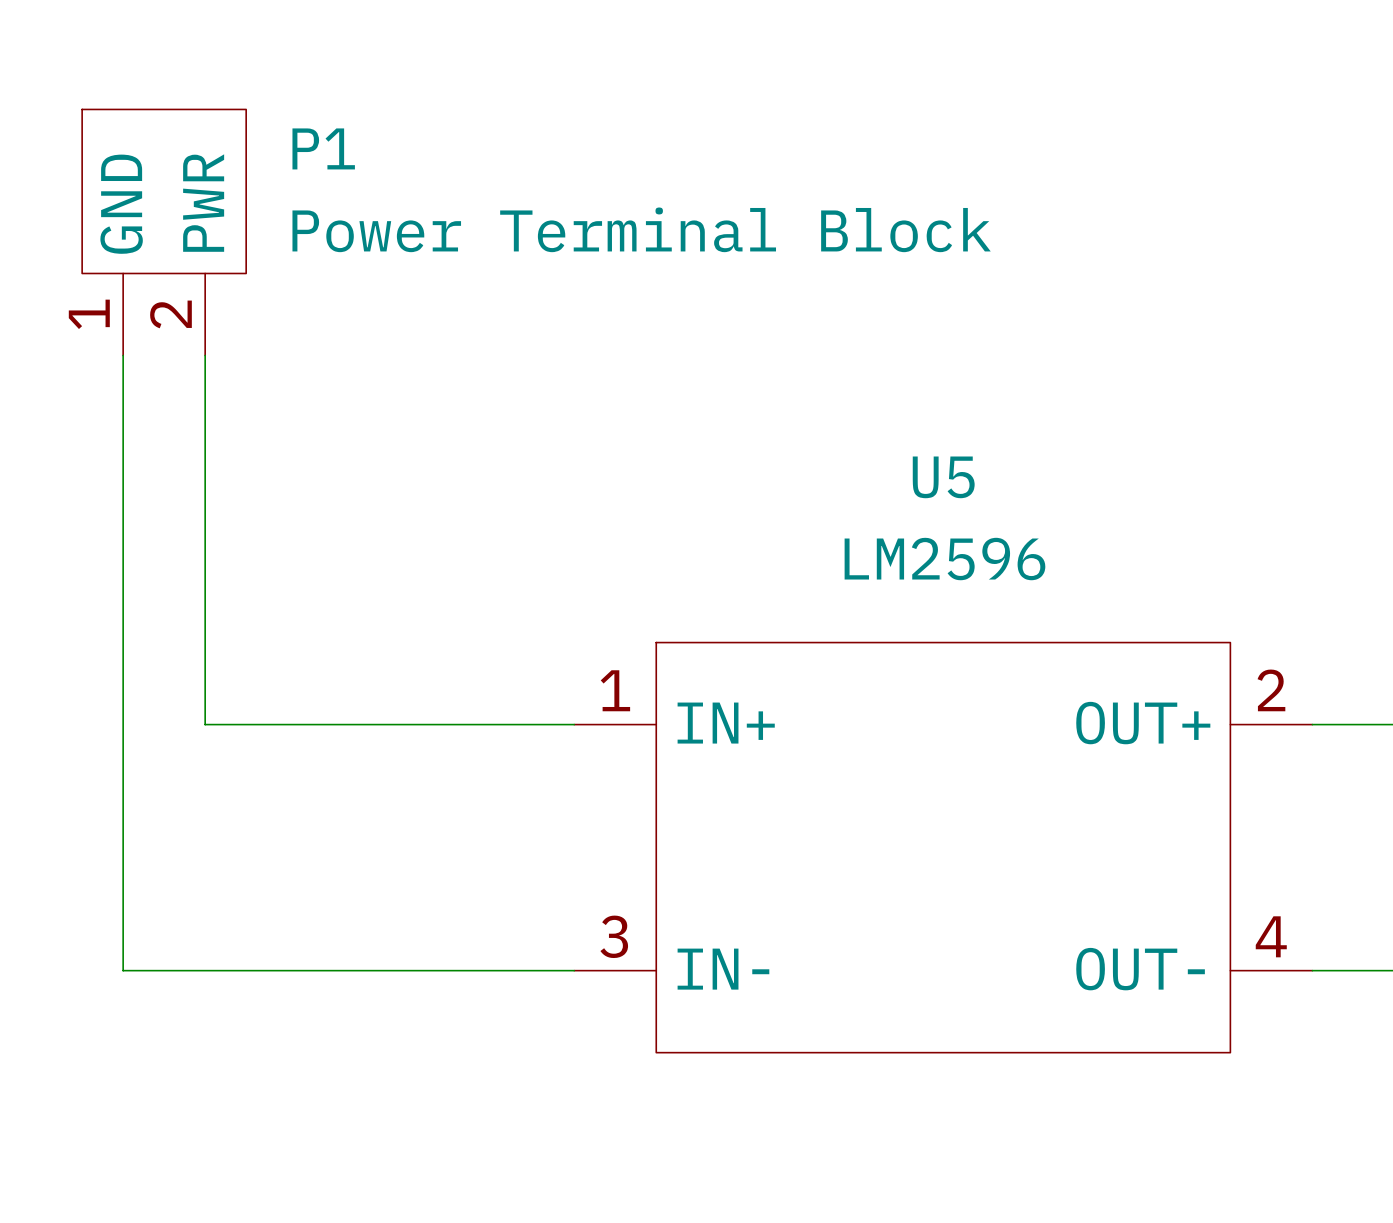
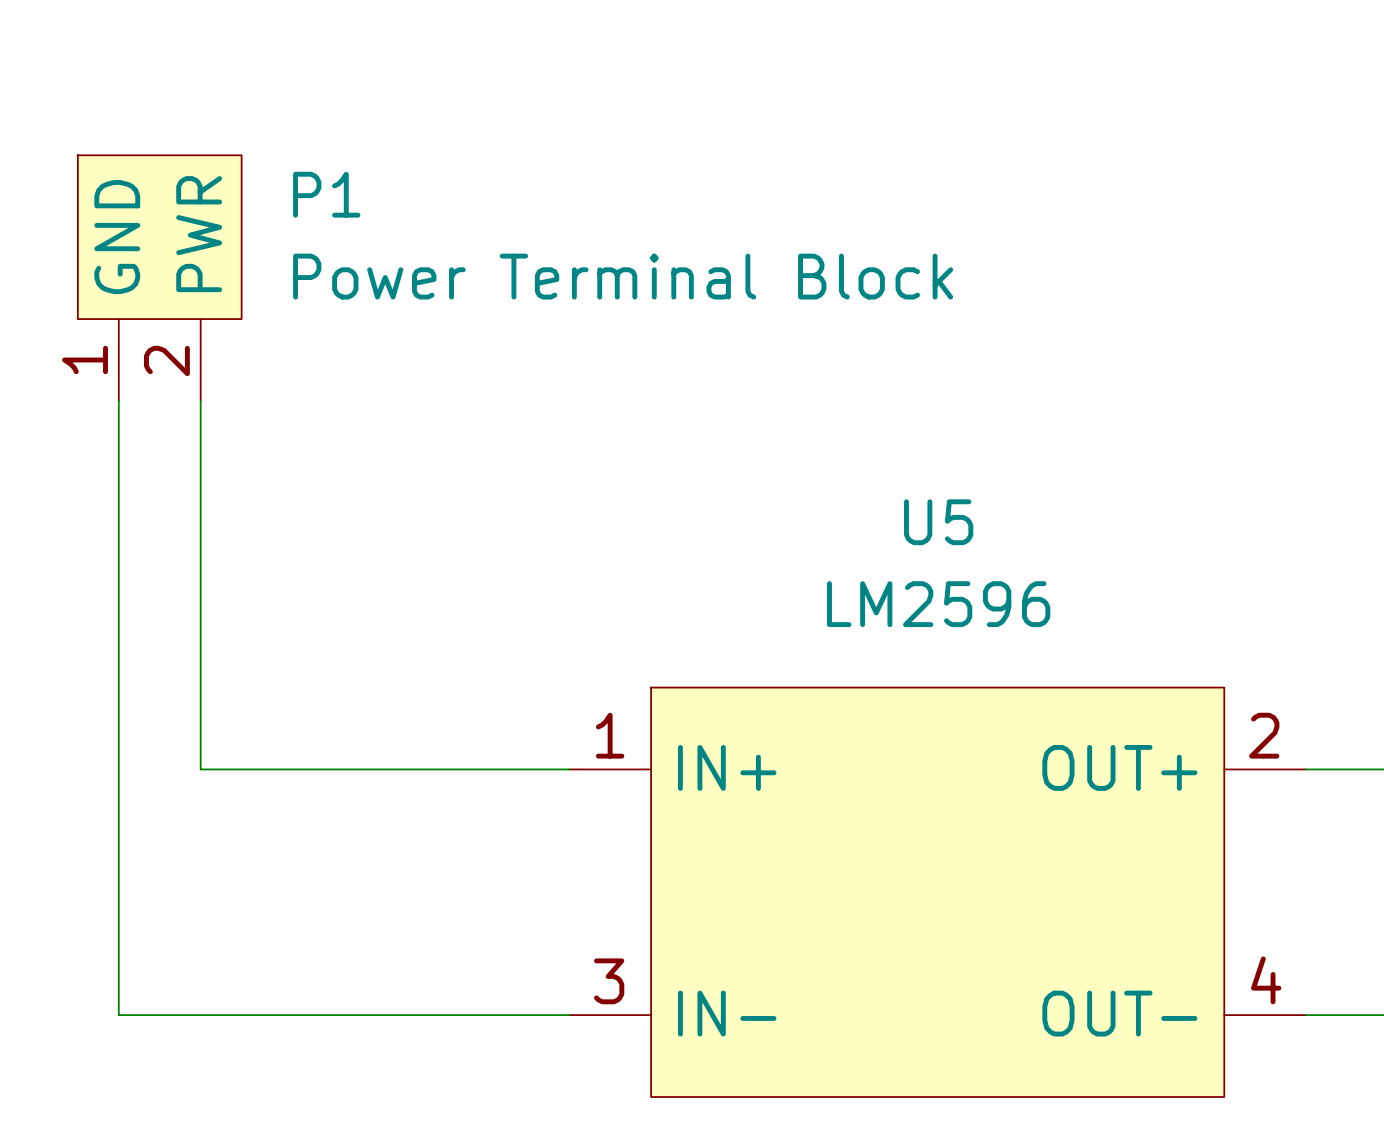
P1 symbol: [82, 109, 247, 356] -> [77, 155, 242, 401]
U5 symbol: [574, 642, 1313, 1053] -> [569, 687, 1307, 1098]

